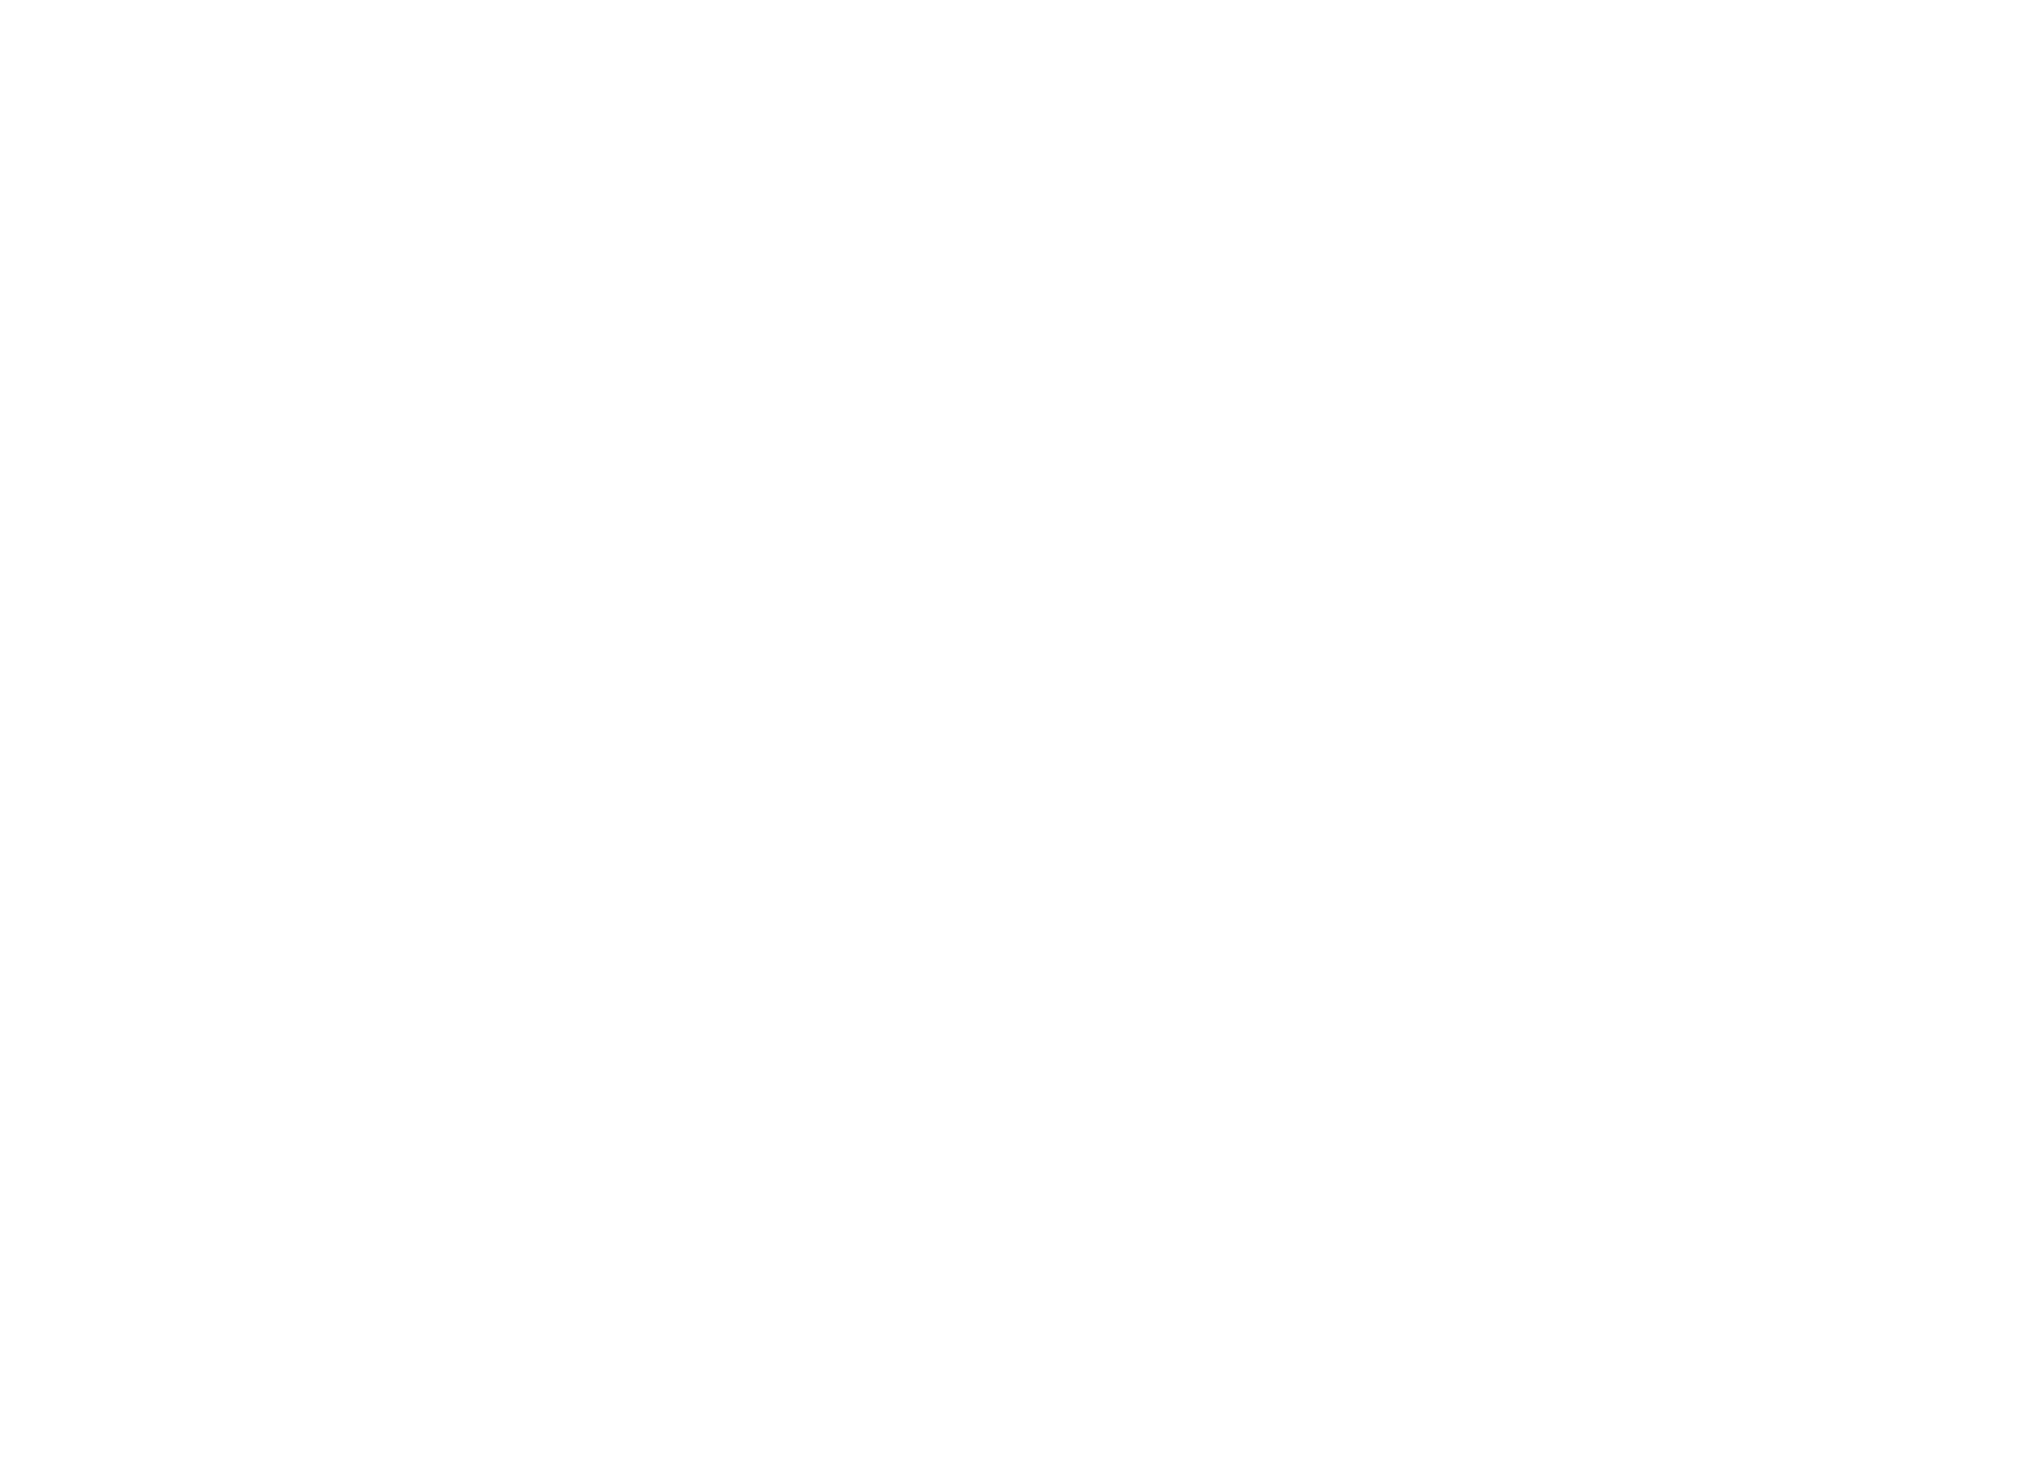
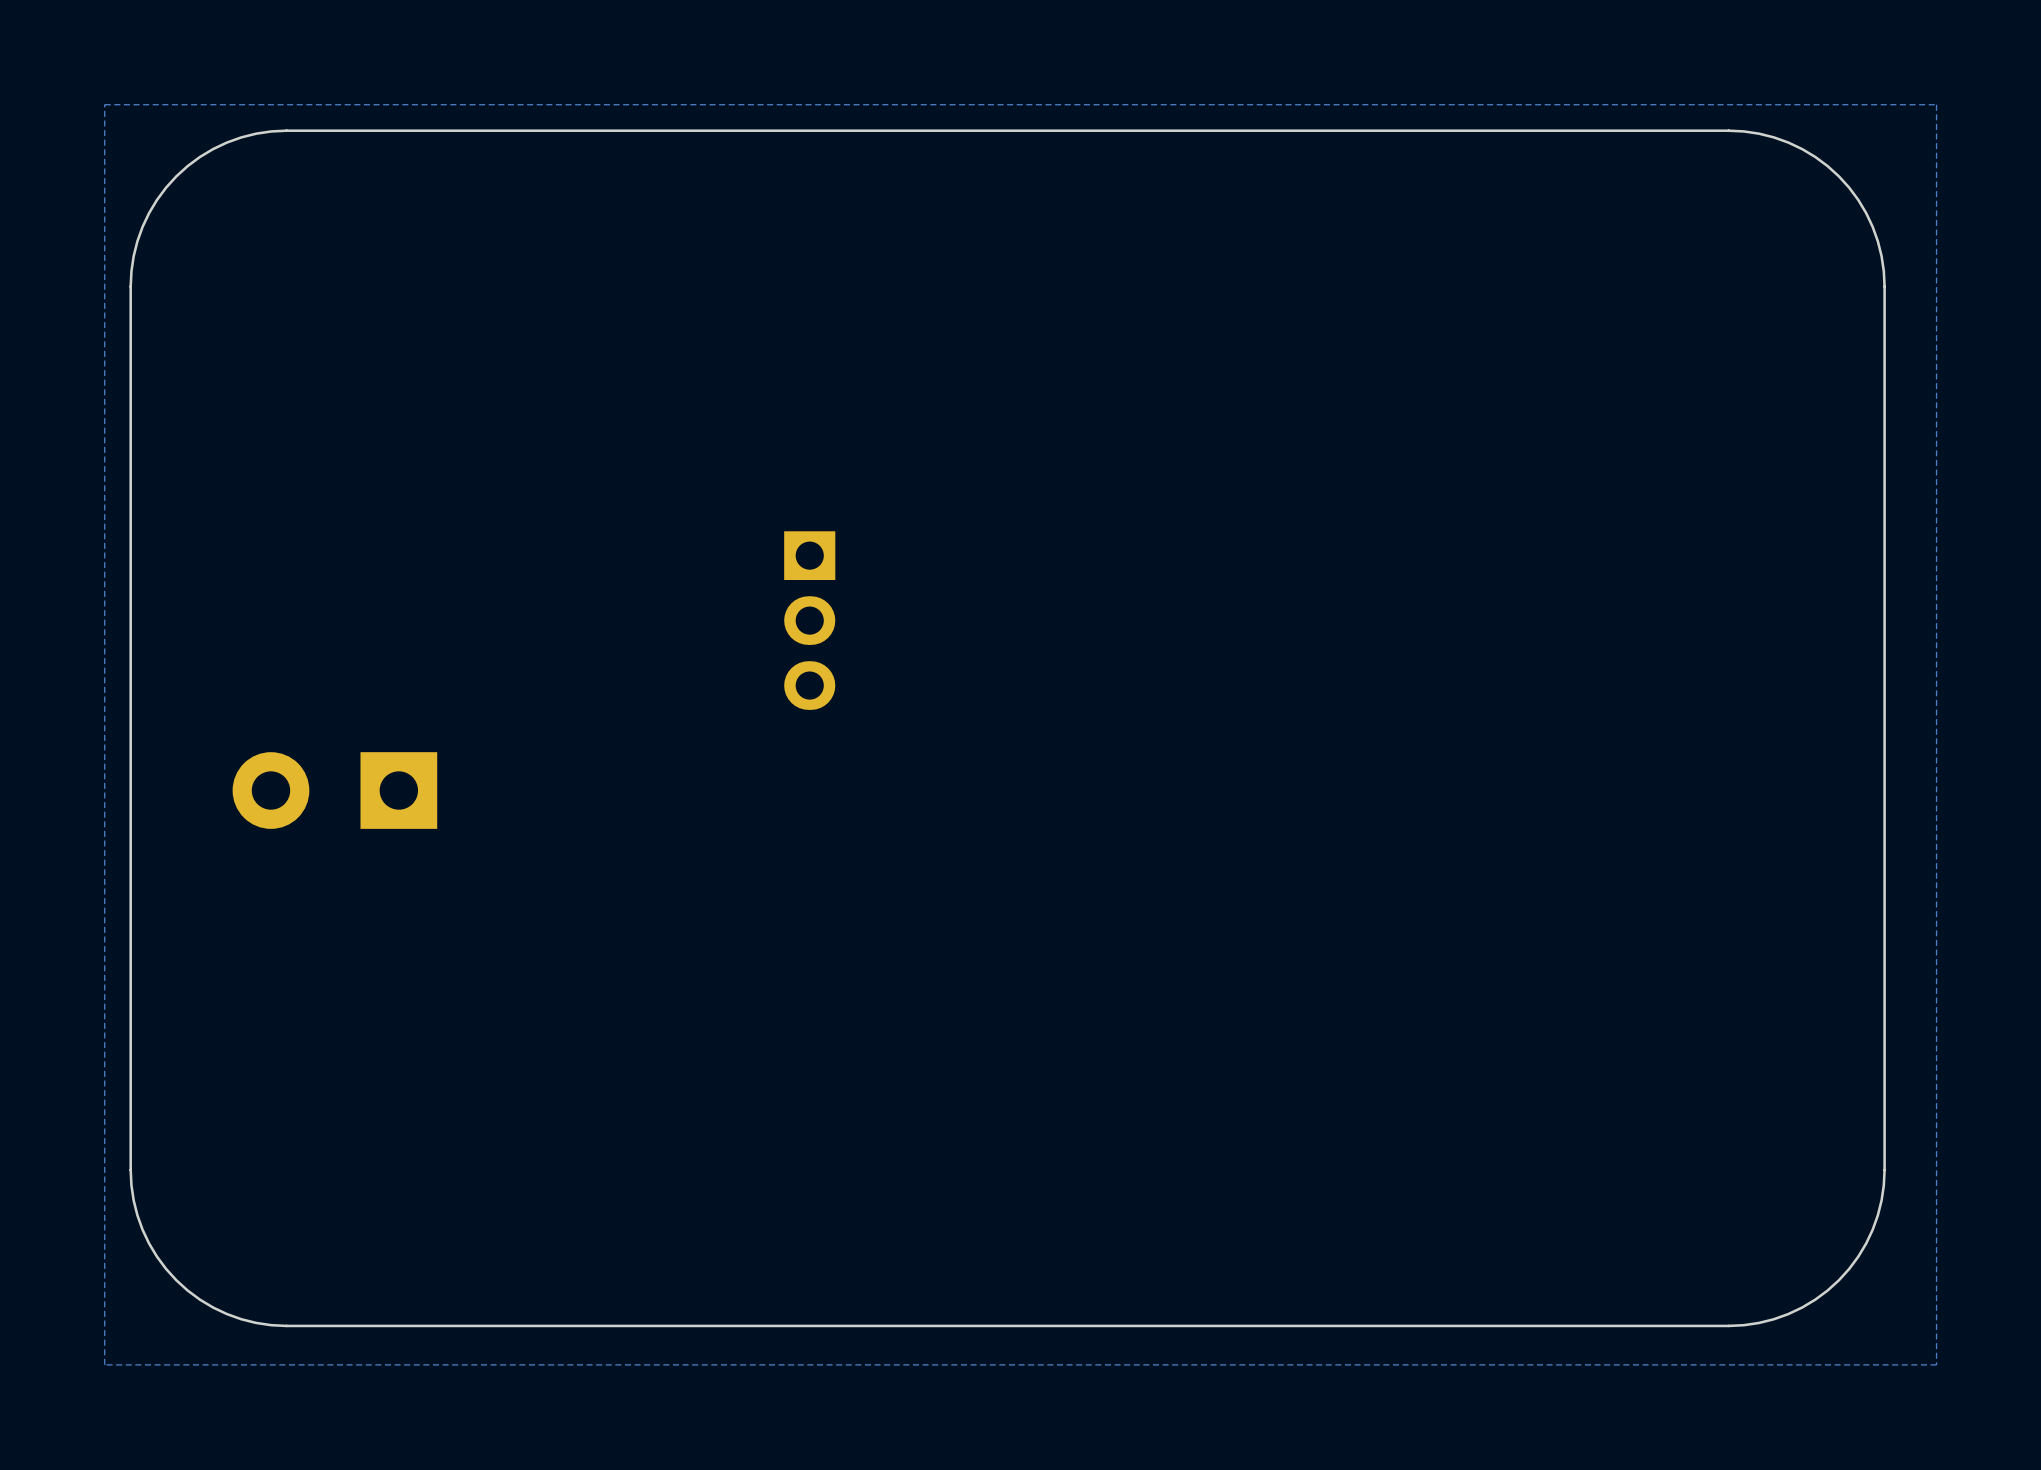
zone outline: none -> (1936, 104) (1936, 1364) (104, 1364) (104, 104) (1936, 104)
board edge: none -> (1728, 130) (286, 130) (241, 137) (199, 156) (176, 176) (149, 213) (137, 241) (130, 286) (130, 1170) (137, 1215) (156, 1256) (176, 1280) (213, 1307) (256, 1322) (286, 1325) (1728, 1325) (1773, 1319) (1815, 1299) (1838, 1280) (1858, 1256) (1877, 1215) (1883, 1185) (1883, 271) (1872, 226) (1858, 199) (1838, 176) (1815, 156) (1788, 142) (1759, 133) (1728, 130)
part: none -> (809, 620)
part: none -> (334, 790)

